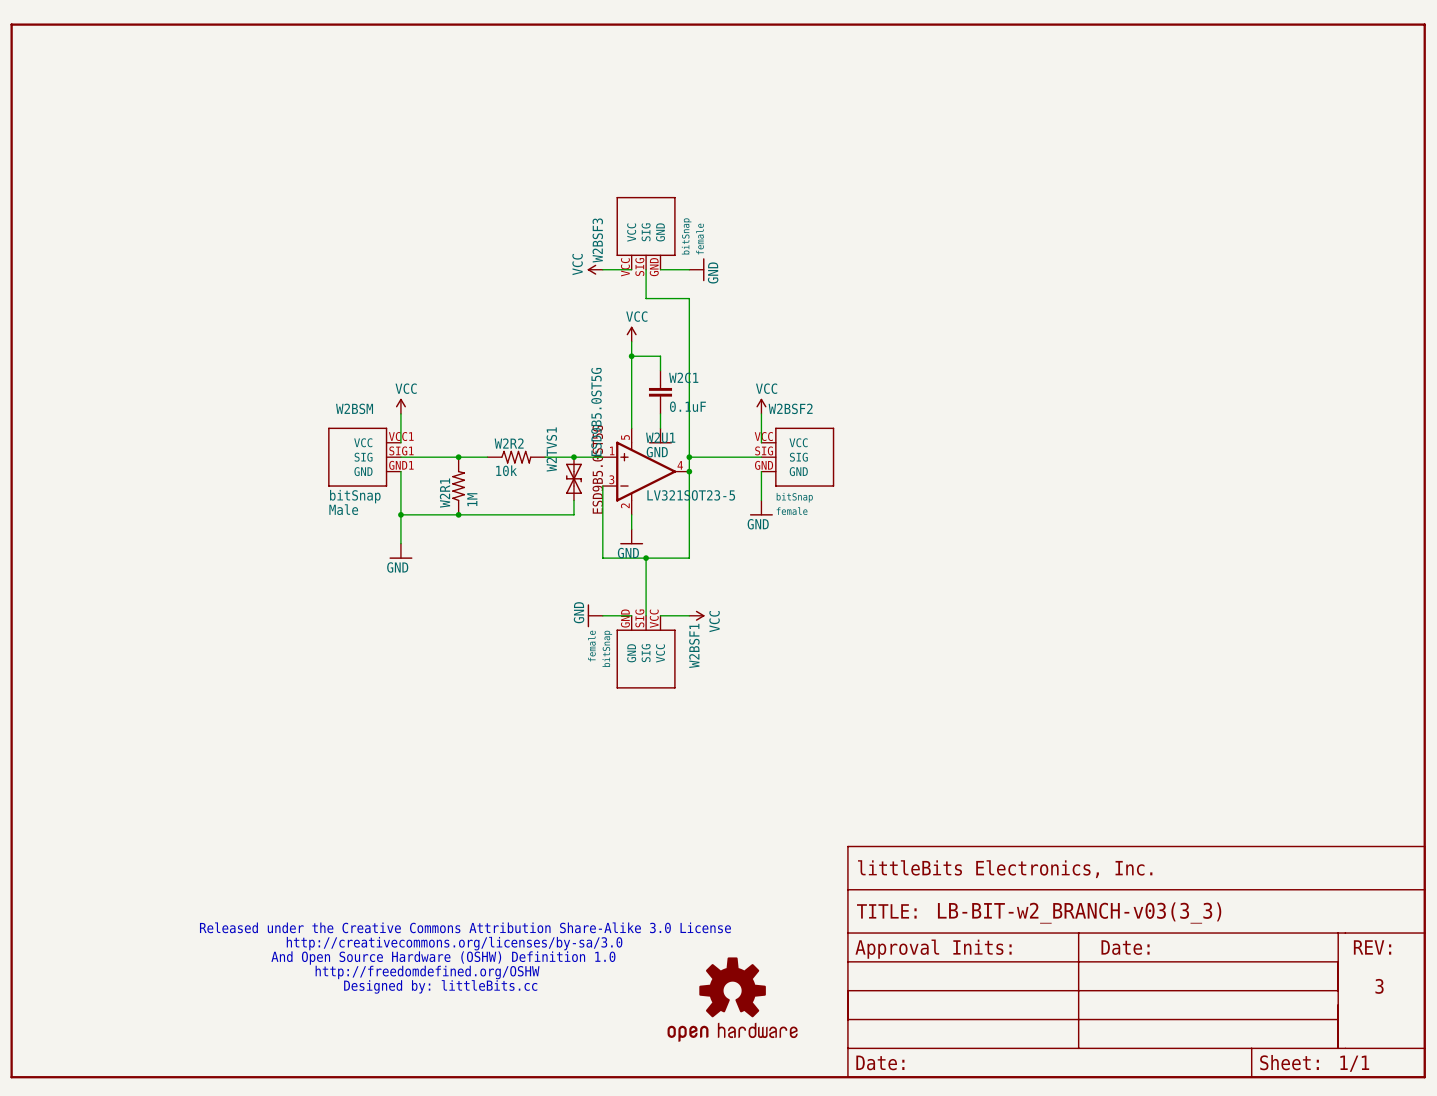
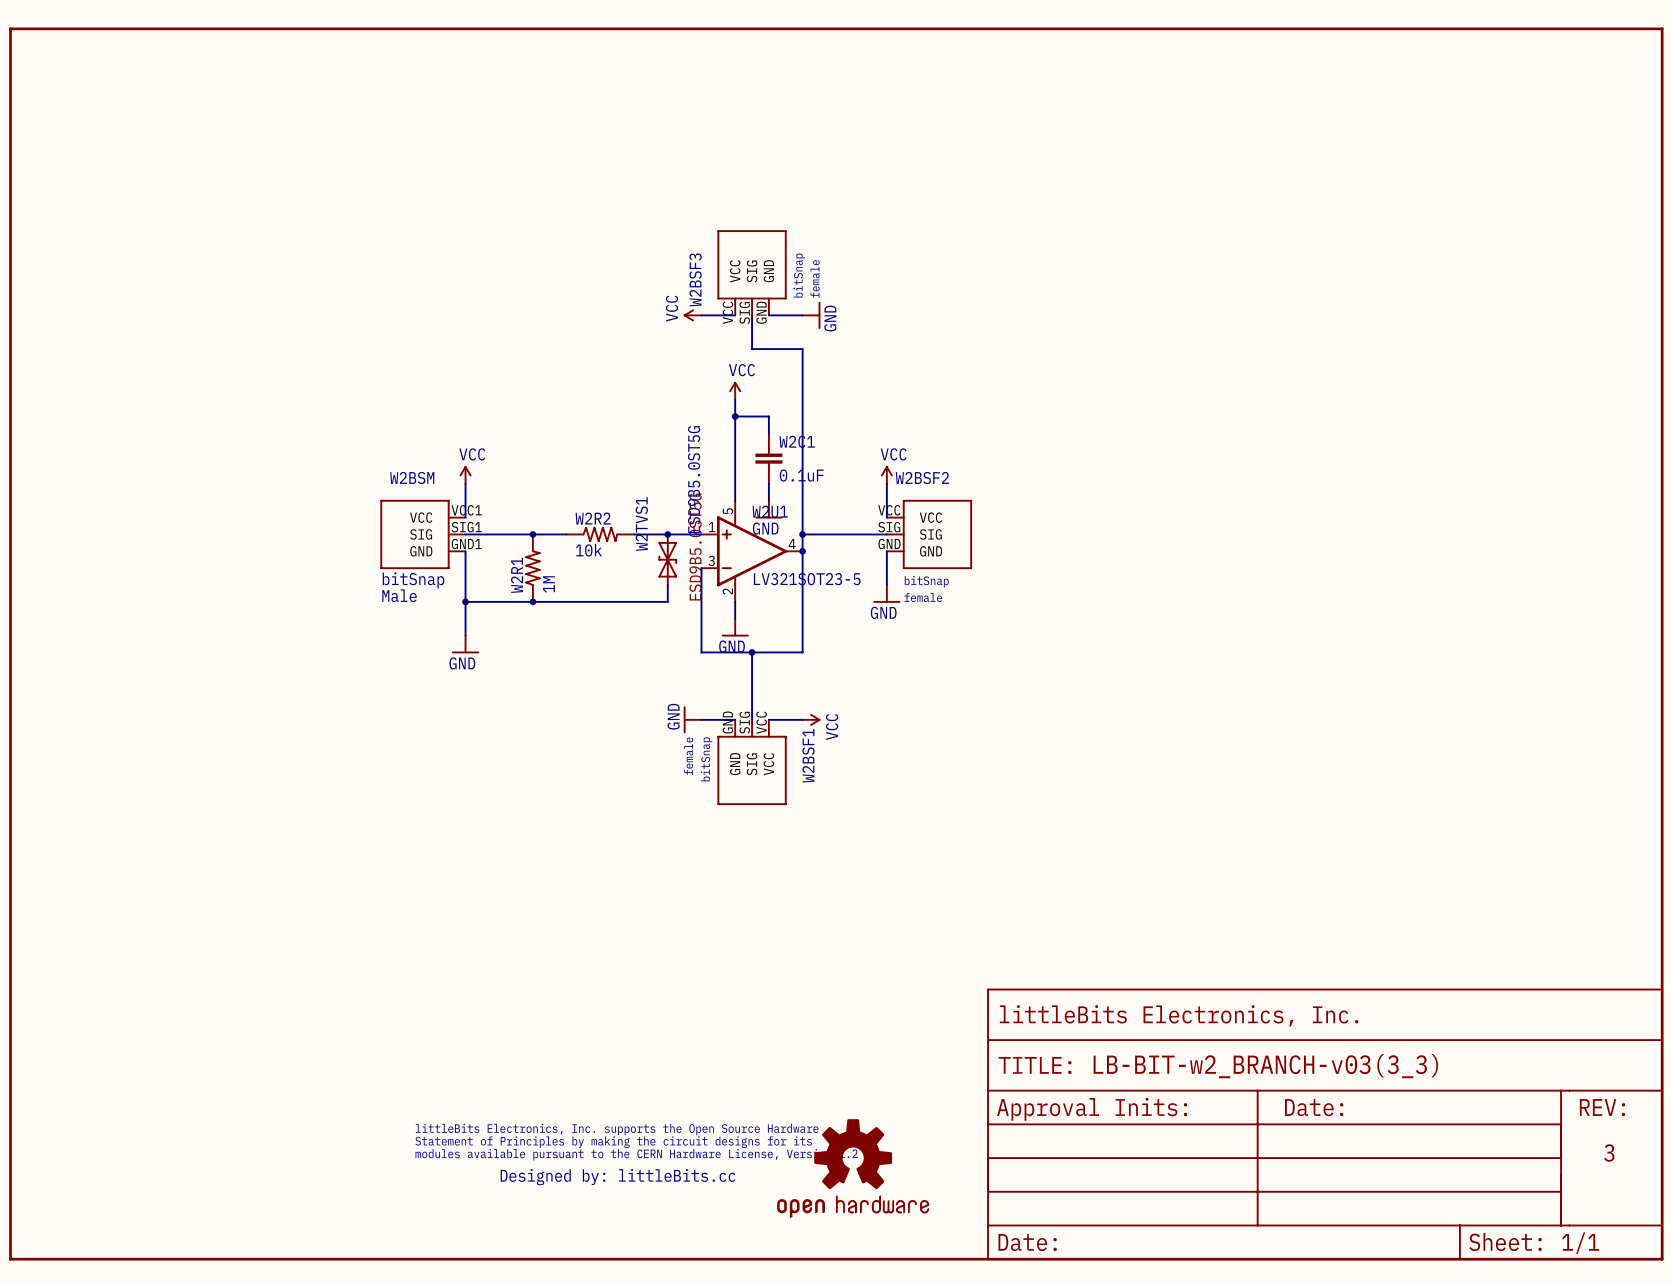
part: (465, 958) -> none
part: none -> (636, 1154)

